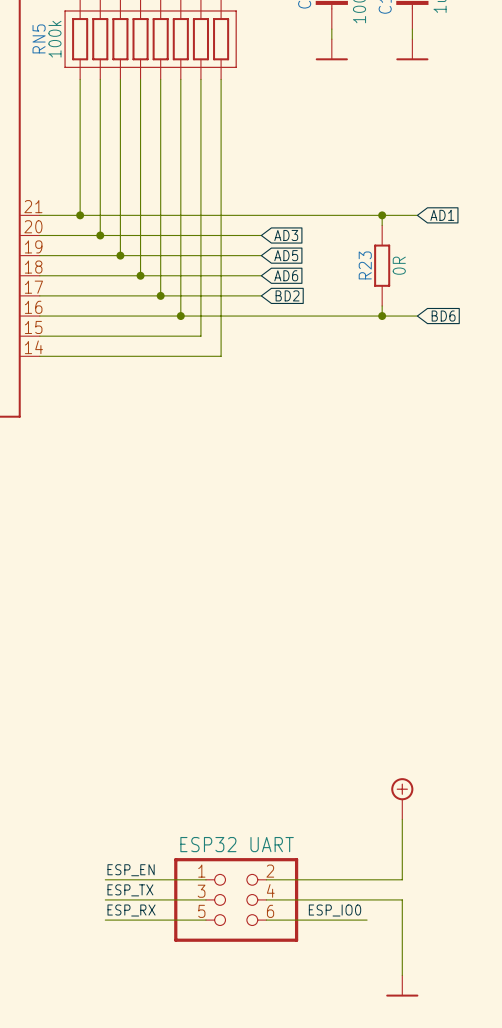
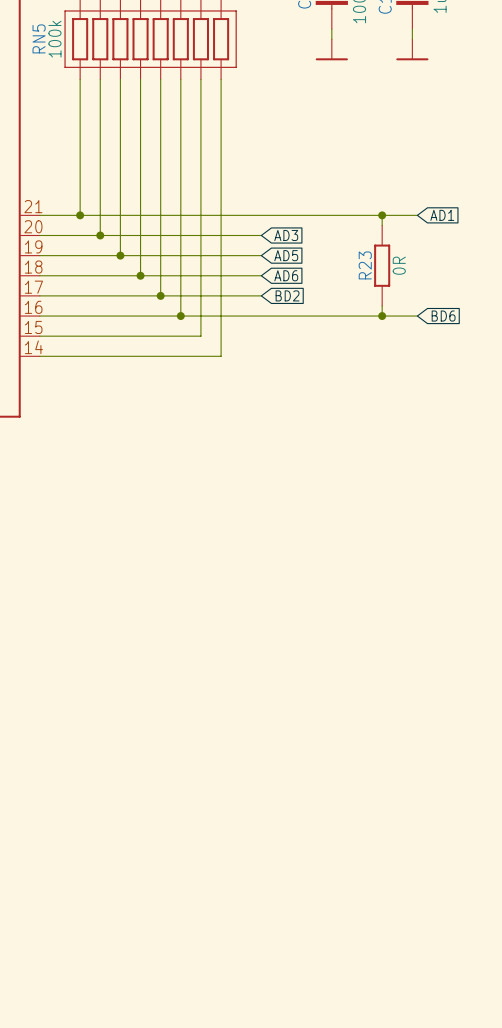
power symbol: (402, 798) -> none
wire: (402, 819) (402, 879) (266, 879) -> none
label: ESP_EN (131, 870) -> none
wire: (105, 879) (205, 879) -> none
label: ESP_TX (130, 890) -> none
wire: (105, 899) (205, 899) -> none
part: ESP32 UART (236, 899) -> none
wire: (266, 899) (402, 899) (402, 975) -> none
label: ESP_RX (131, 910) -> none
label: ESP_IO0 (335, 910) -> none
wire: (105, 920) (205, 920) -> none
wire: (266, 920) (367, 920) -> none
power symbol: (402, 986) -> none

